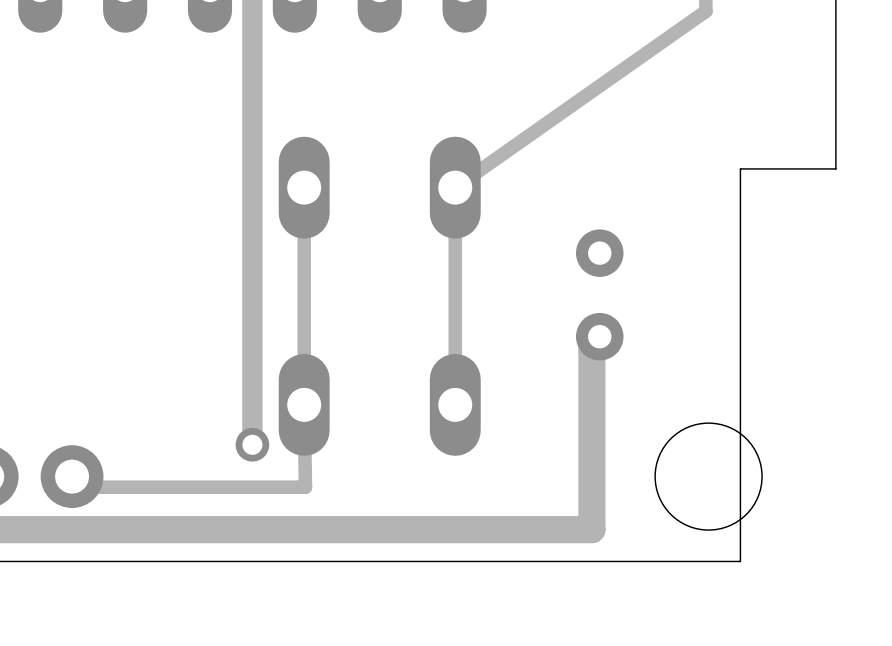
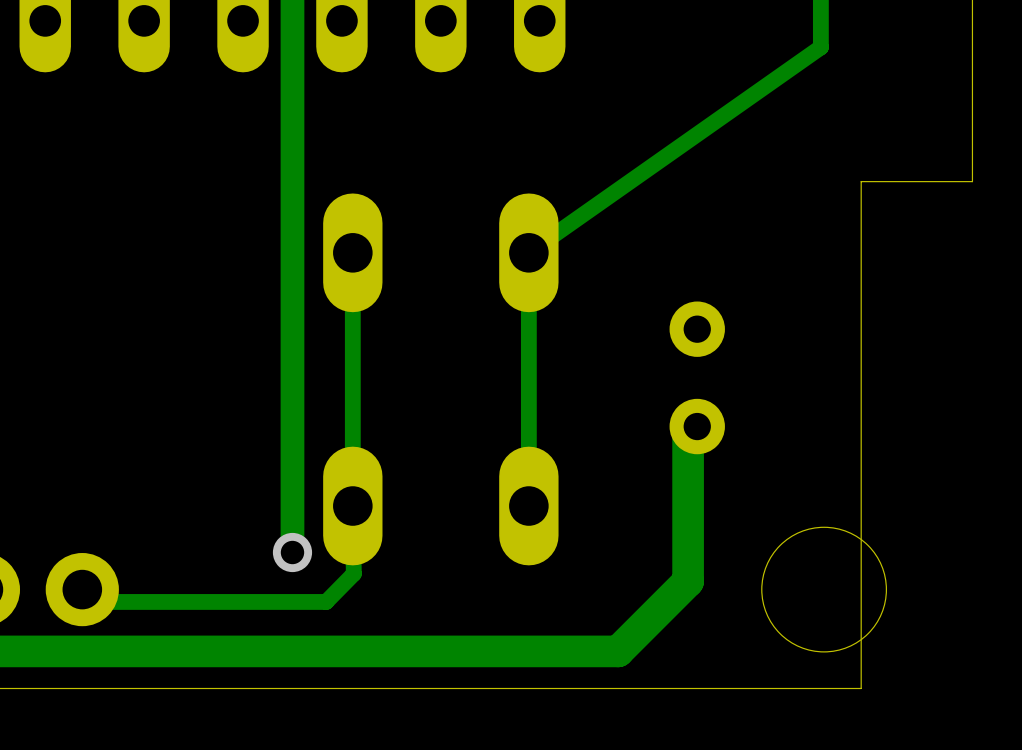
board edge: (835, 126) (835, 168) (740, 168) -> (972, 181) (861, 181) (861, 231)
track: (305, 463) (305, 487) (281, 487) -> (353, 573) (326, 601)
track: (591, 469) (591, 529) (531, 529) -> (688, 581) (618, 651)

